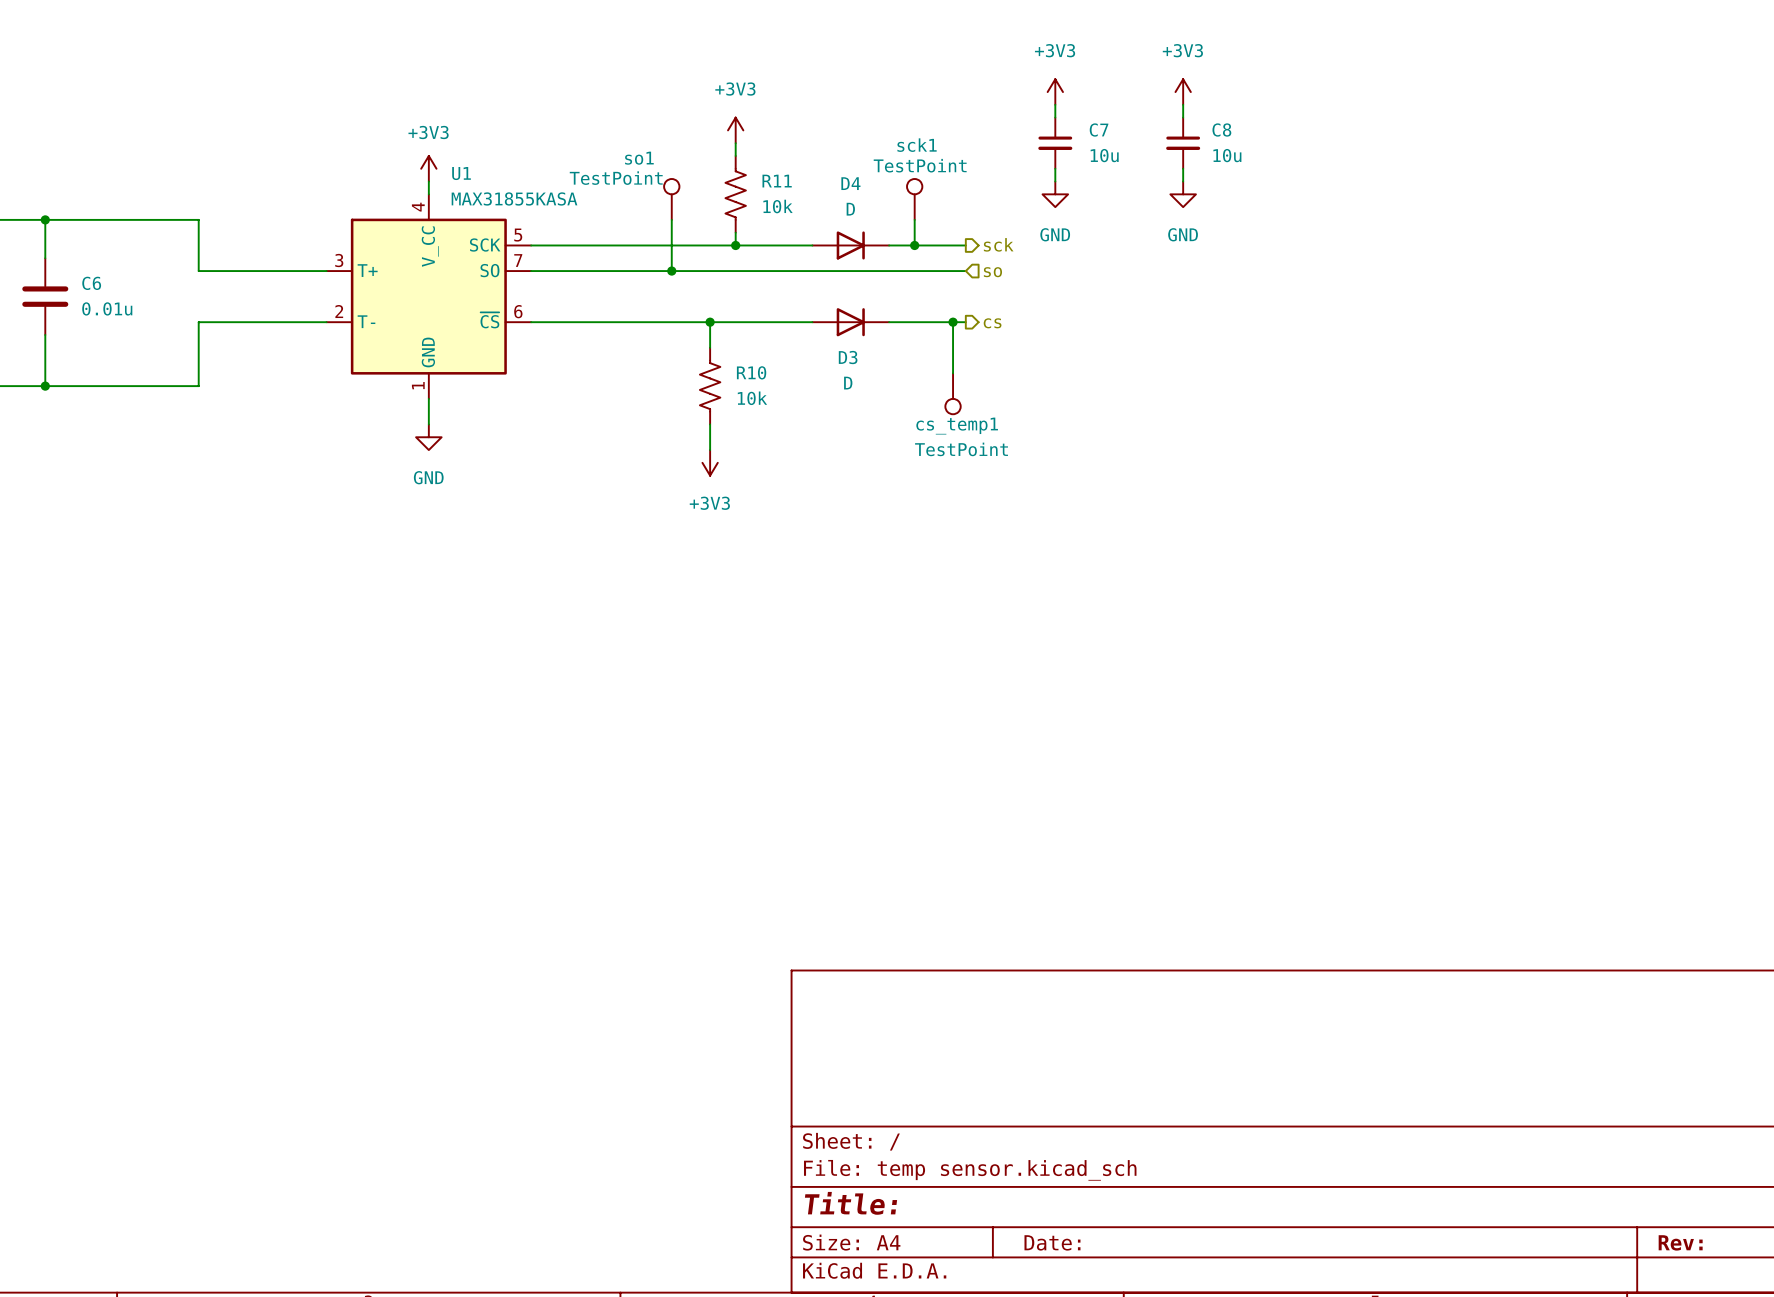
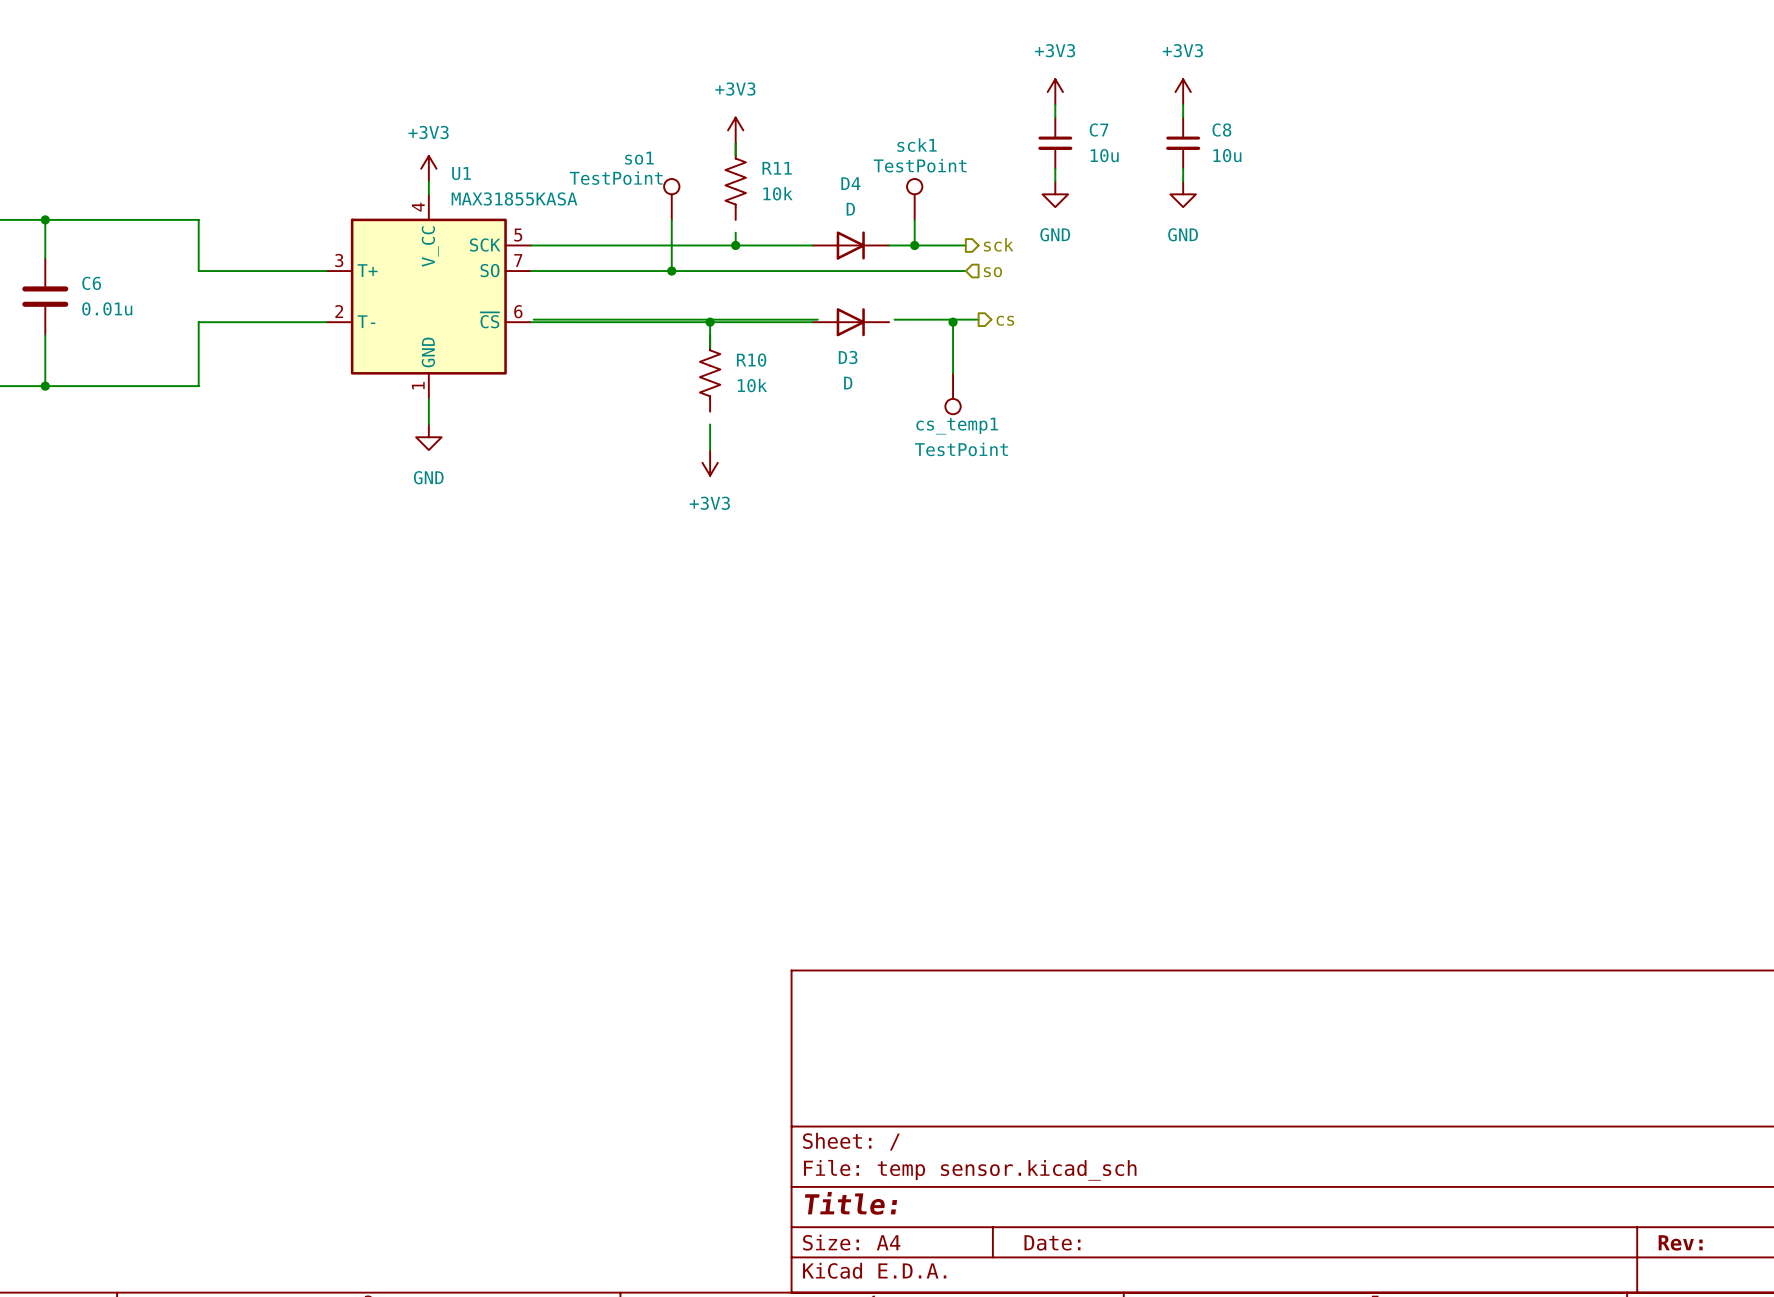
R11 position: (735, 194) -> (735, 181)
wire: none -> (533, 319) (817, 319)
wire: none -> (894, 319) (978, 319)
wire: (889, 322) (965, 322) -> none
hierarchical label position: cs (992, 323) -> cs (1005, 320)
R10 position: (710, 386) -> (710, 373)

